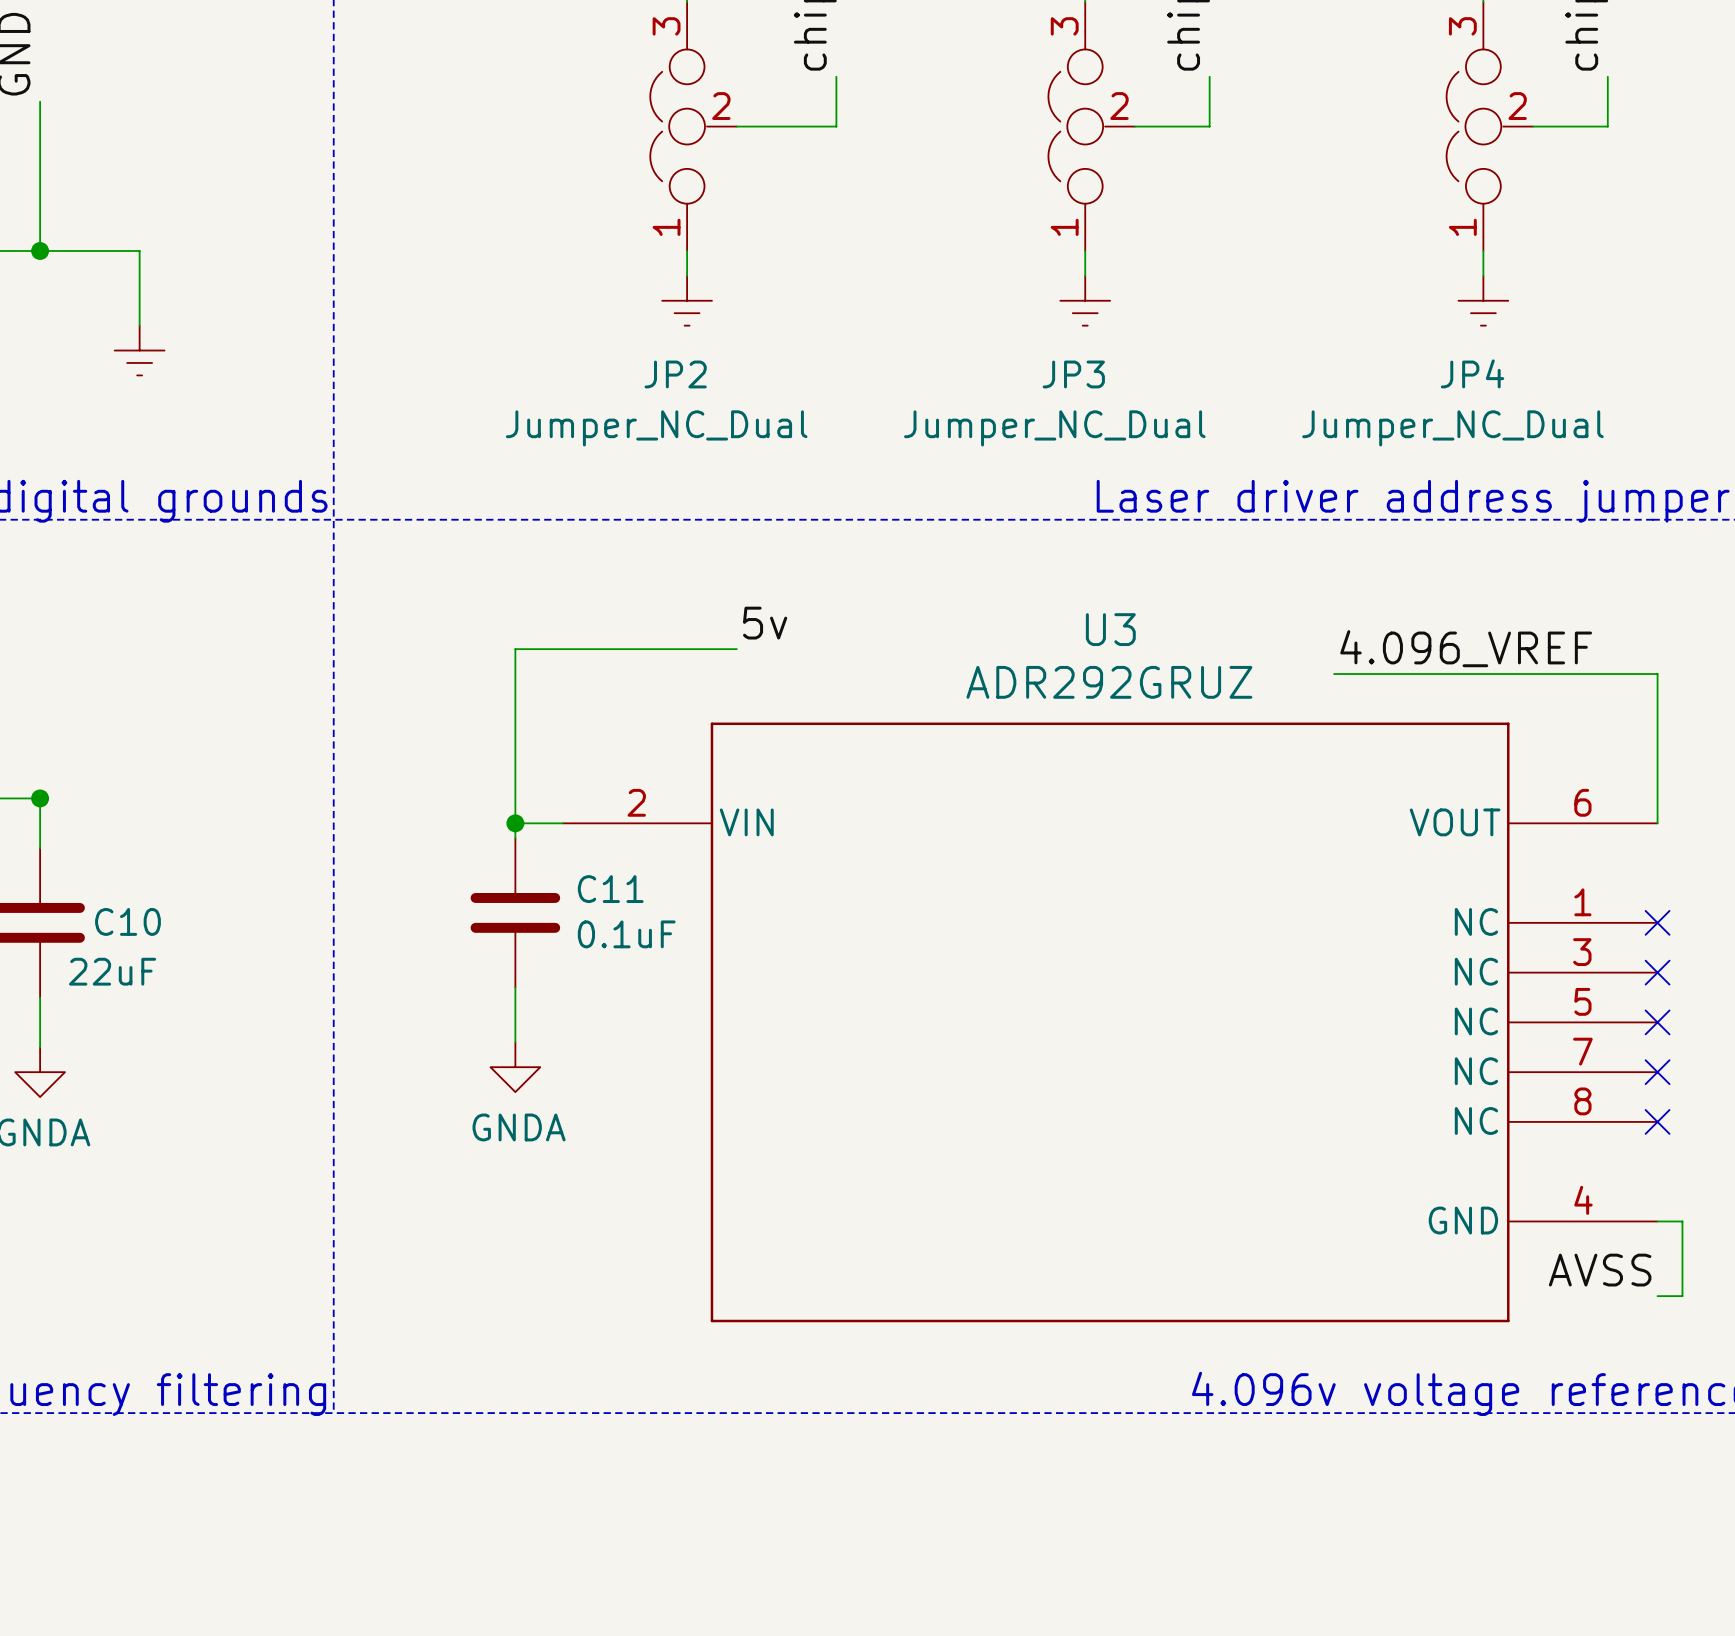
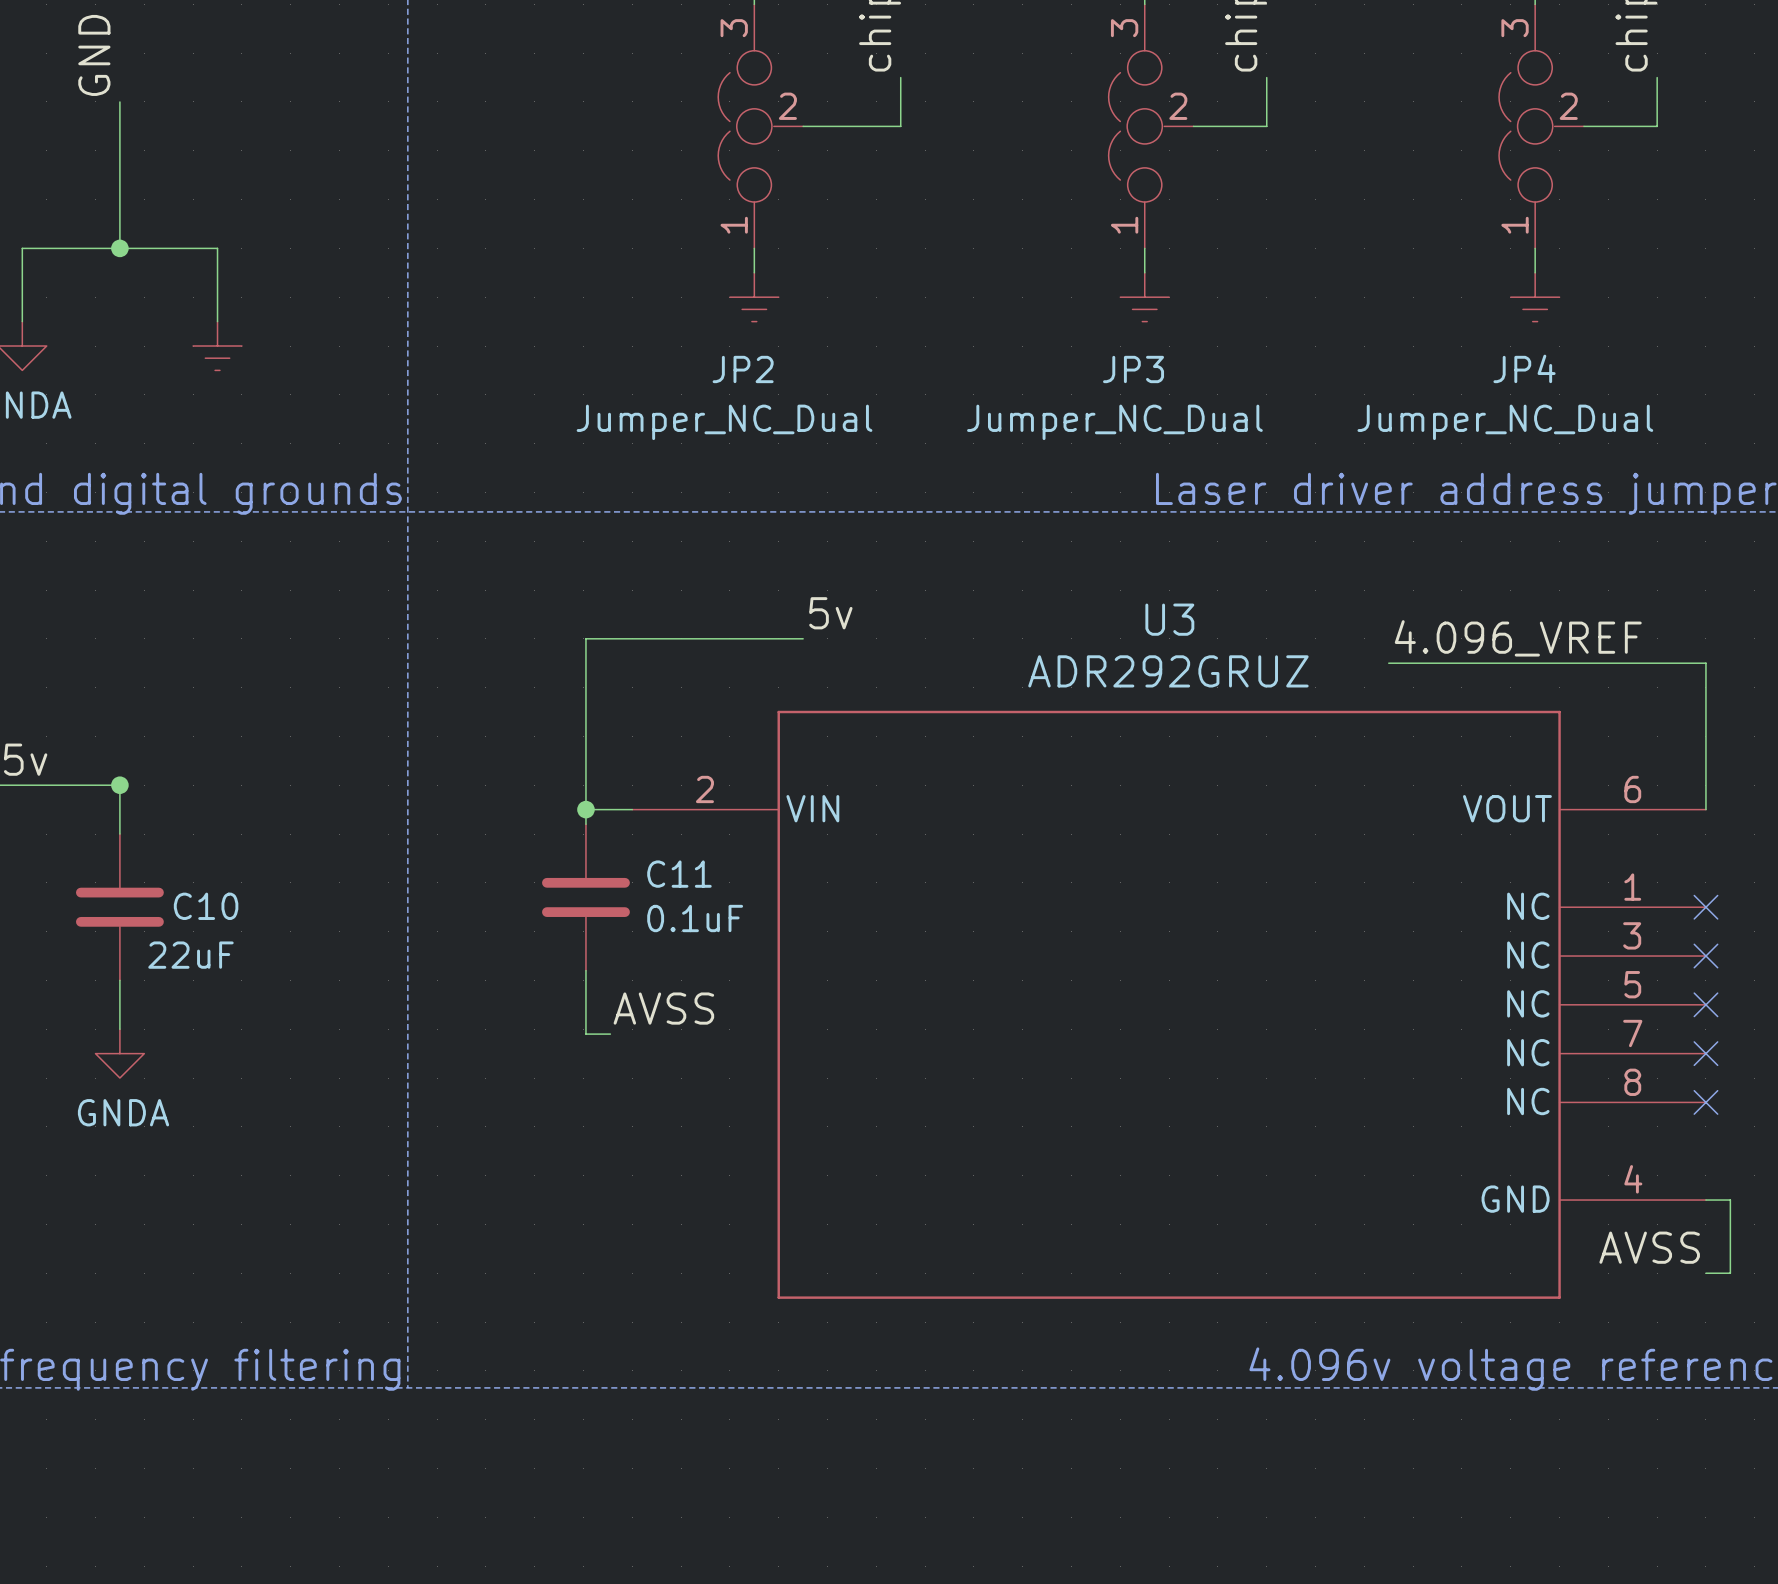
label: none -> AVSS (663, 1008)
wire: none -> (585, 1024) (585, 1034) (610, 1034)
power symbol: GNDA (515, 1067) -> none

